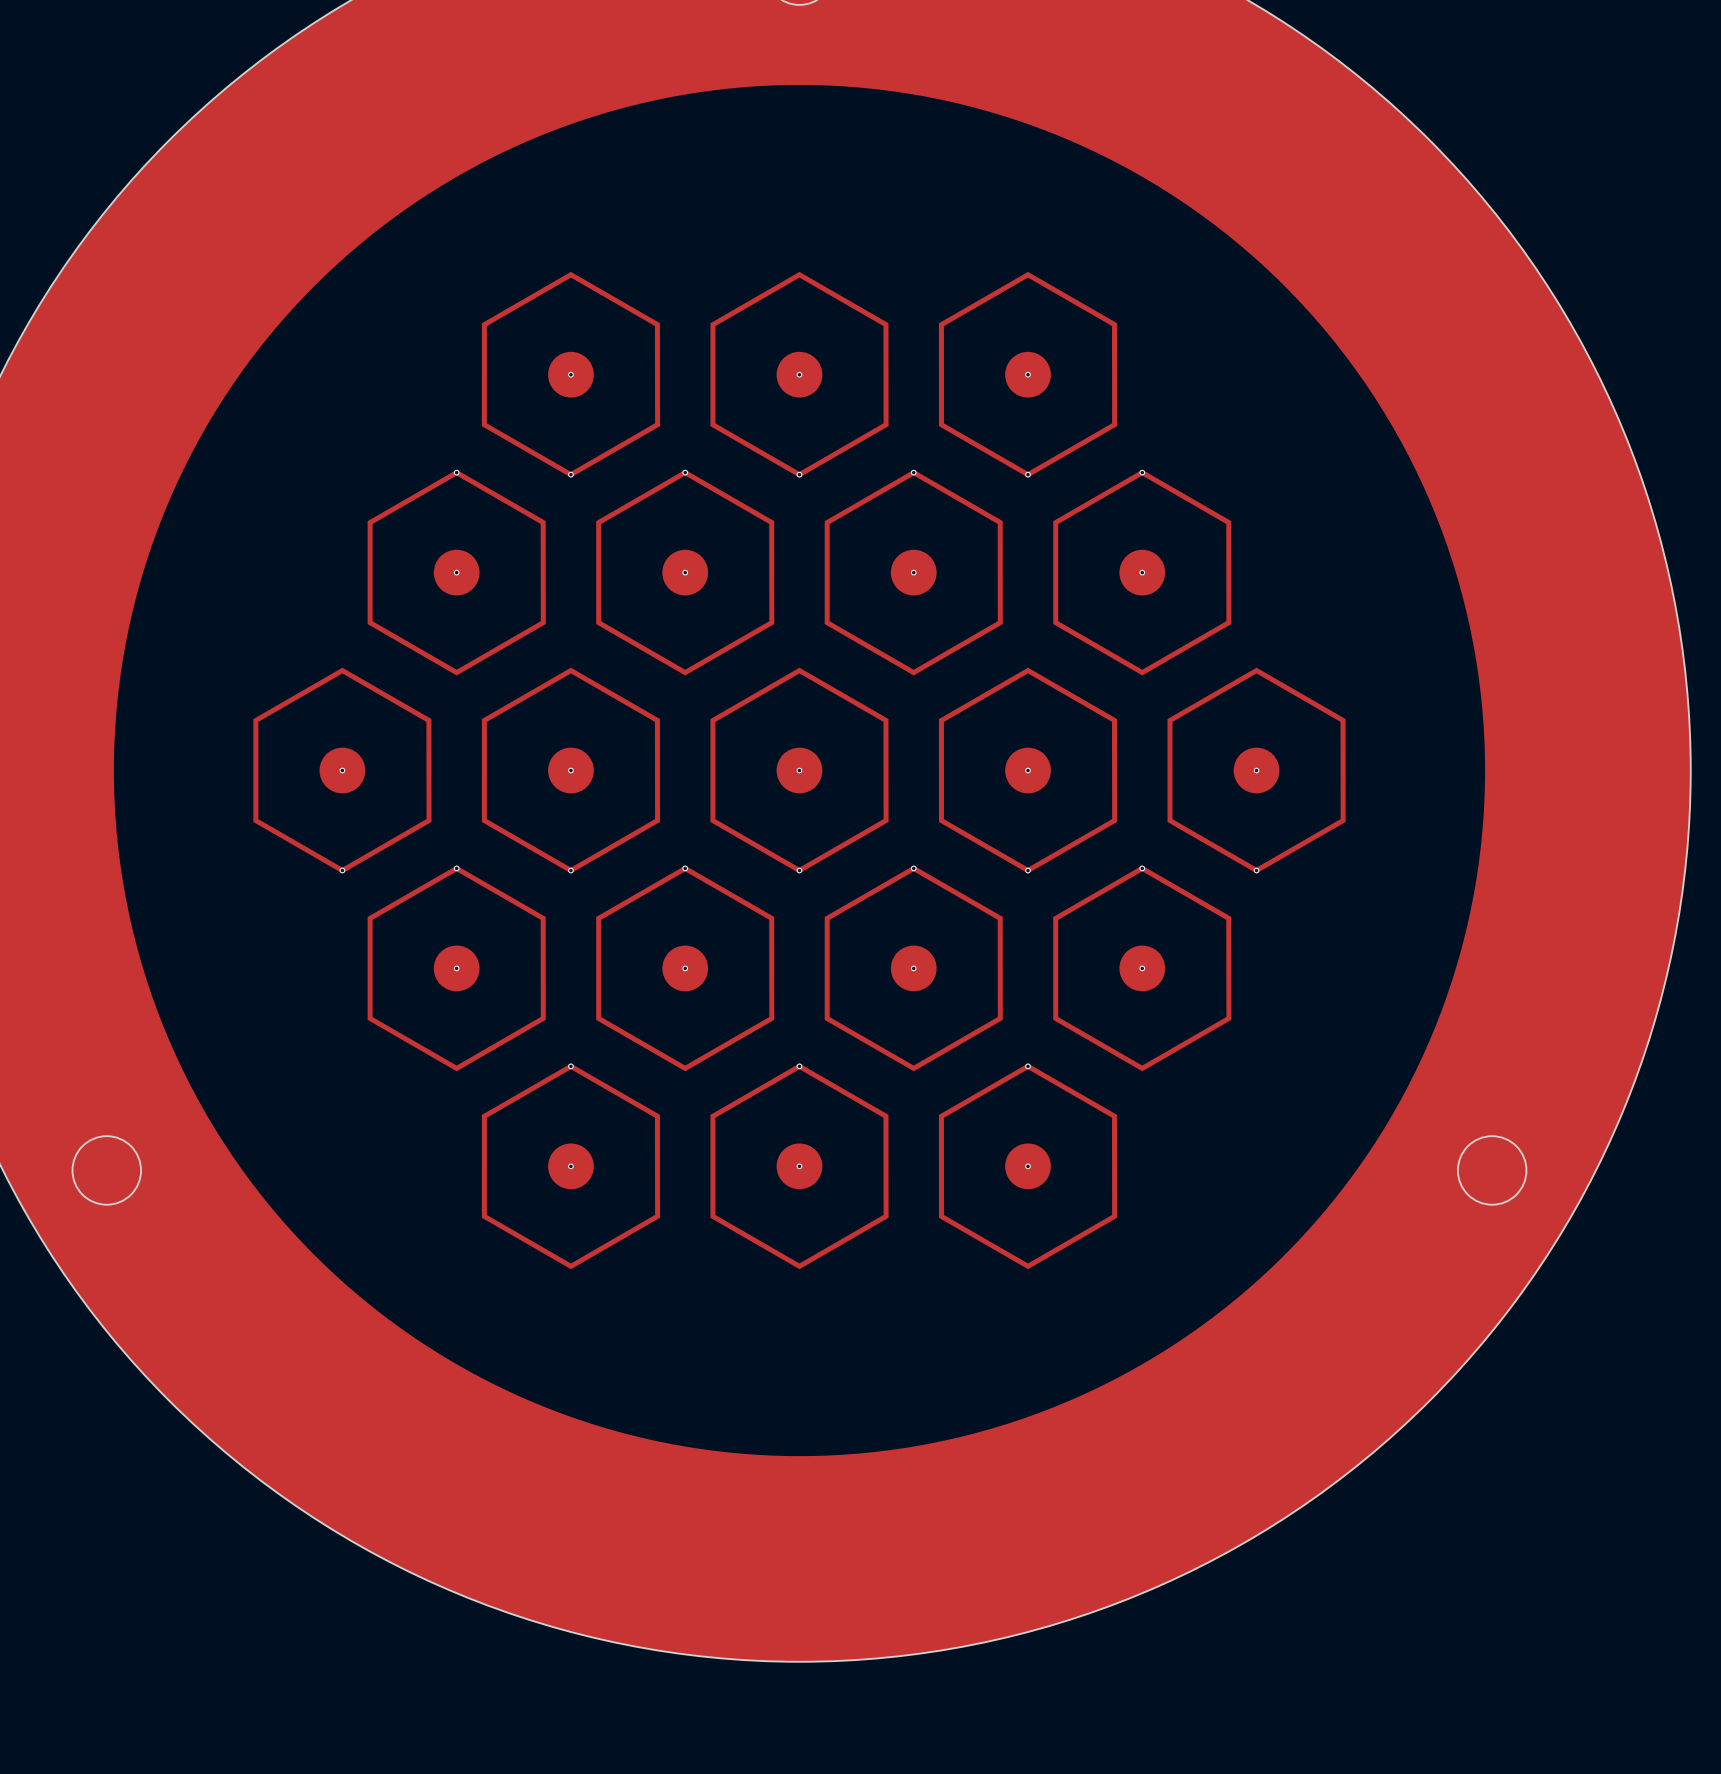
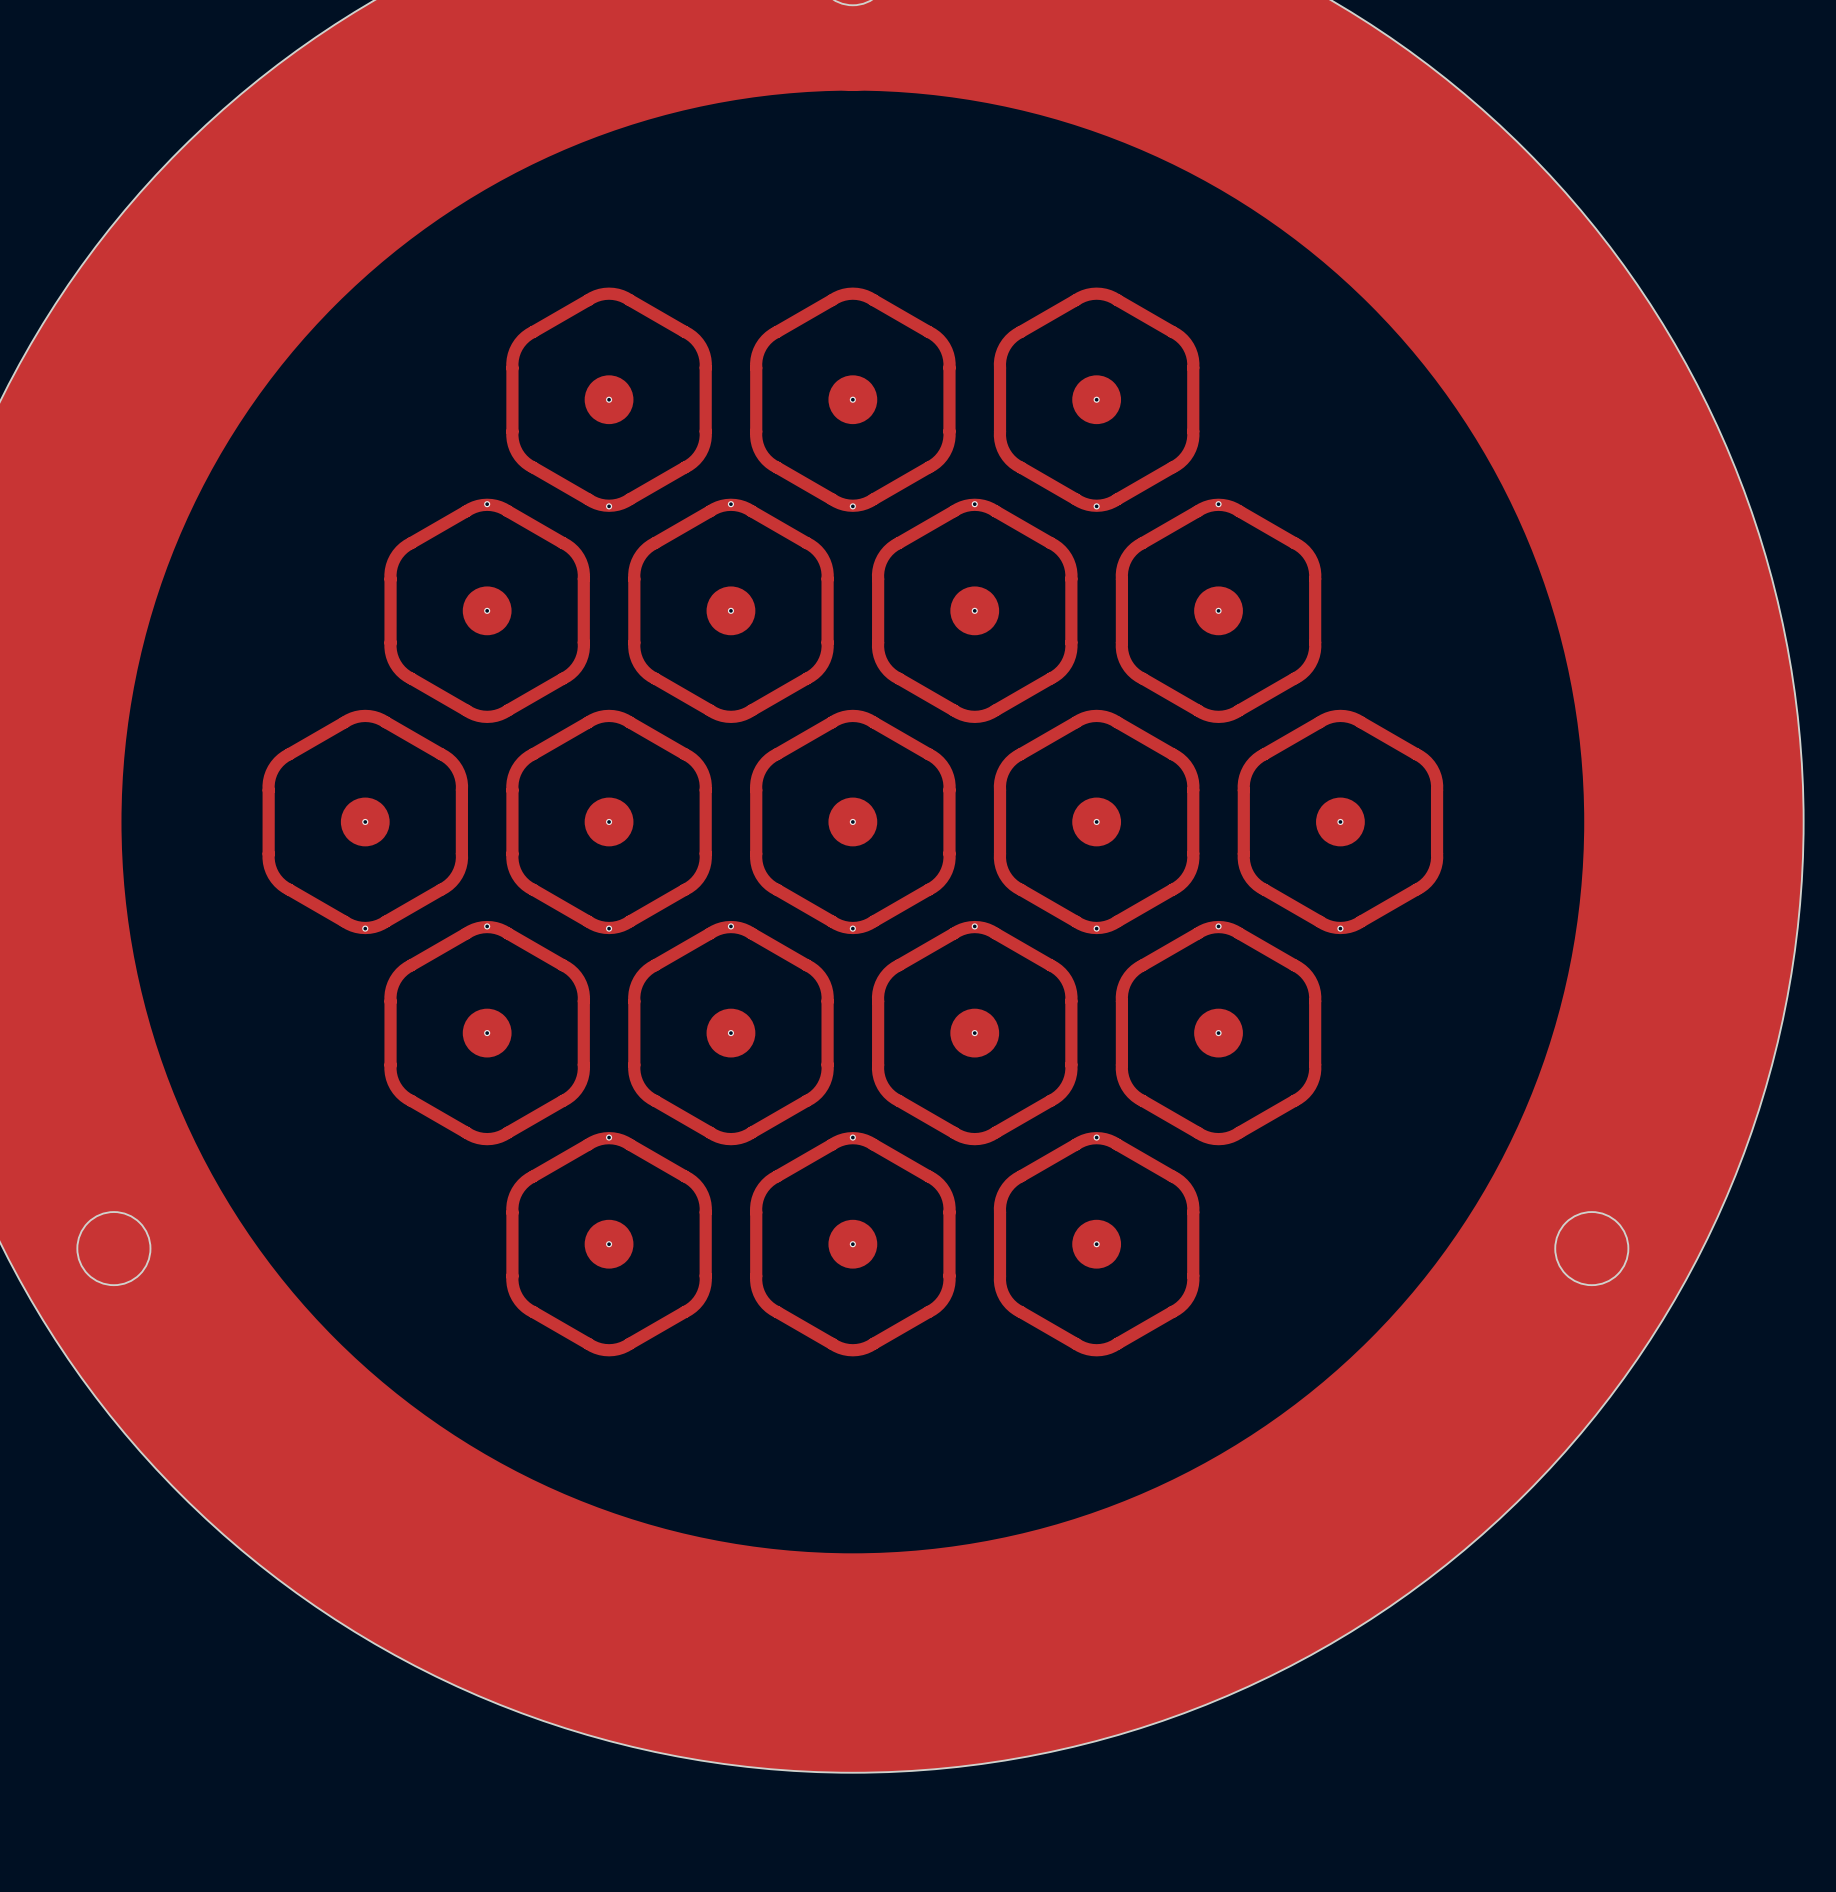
drawing shape: [481, 271, 661, 478] -> [506, 287, 712, 512]
drawing shape: [710, 271, 889, 478] -> [750, 287, 956, 512]
drawing shape: [938, 271, 1118, 478] -> [993, 287, 1200, 512]
drawing shape: [367, 469, 546, 676] -> [384, 498, 590, 723]
drawing shape: [596, 469, 775, 676] -> [628, 498, 834, 723]
drawing shape: [824, 469, 1003, 676] -> [871, 498, 1078, 723]
drawing shape: [1053, 469, 1232, 676] -> [1115, 498, 1322, 723]
drawing shape: [253, 667, 432, 874] -> [262, 709, 469, 935]
drawing shape: [481, 667, 661, 874] -> [506, 709, 712, 935]
drawing shape: [710, 667, 889, 874] -> [750, 709, 956, 935]
drawing shape: [938, 667, 1118, 874] -> [993, 709, 1200, 935]
drawing shape: [1167, 667, 1346, 874] -> [1237, 709, 1444, 935]
drawing shape: [367, 865, 546, 1072] -> [384, 920, 590, 1146]
drawing shape: [596, 865, 775, 1072] -> [628, 920, 834, 1146]
drawing shape: [824, 865, 1003, 1072] -> [871, 920, 1078, 1146]
drawing shape: [1053, 865, 1232, 1072] -> [1115, 920, 1322, 1146]
drawing shape: [481, 1063, 661, 1270] -> [506, 1132, 712, 1357]
drawing shape: [710, 1063, 889, 1270] -> [750, 1132, 956, 1357]
drawing shape: [938, 1063, 1118, 1270] -> [993, 1132, 1200, 1357]

